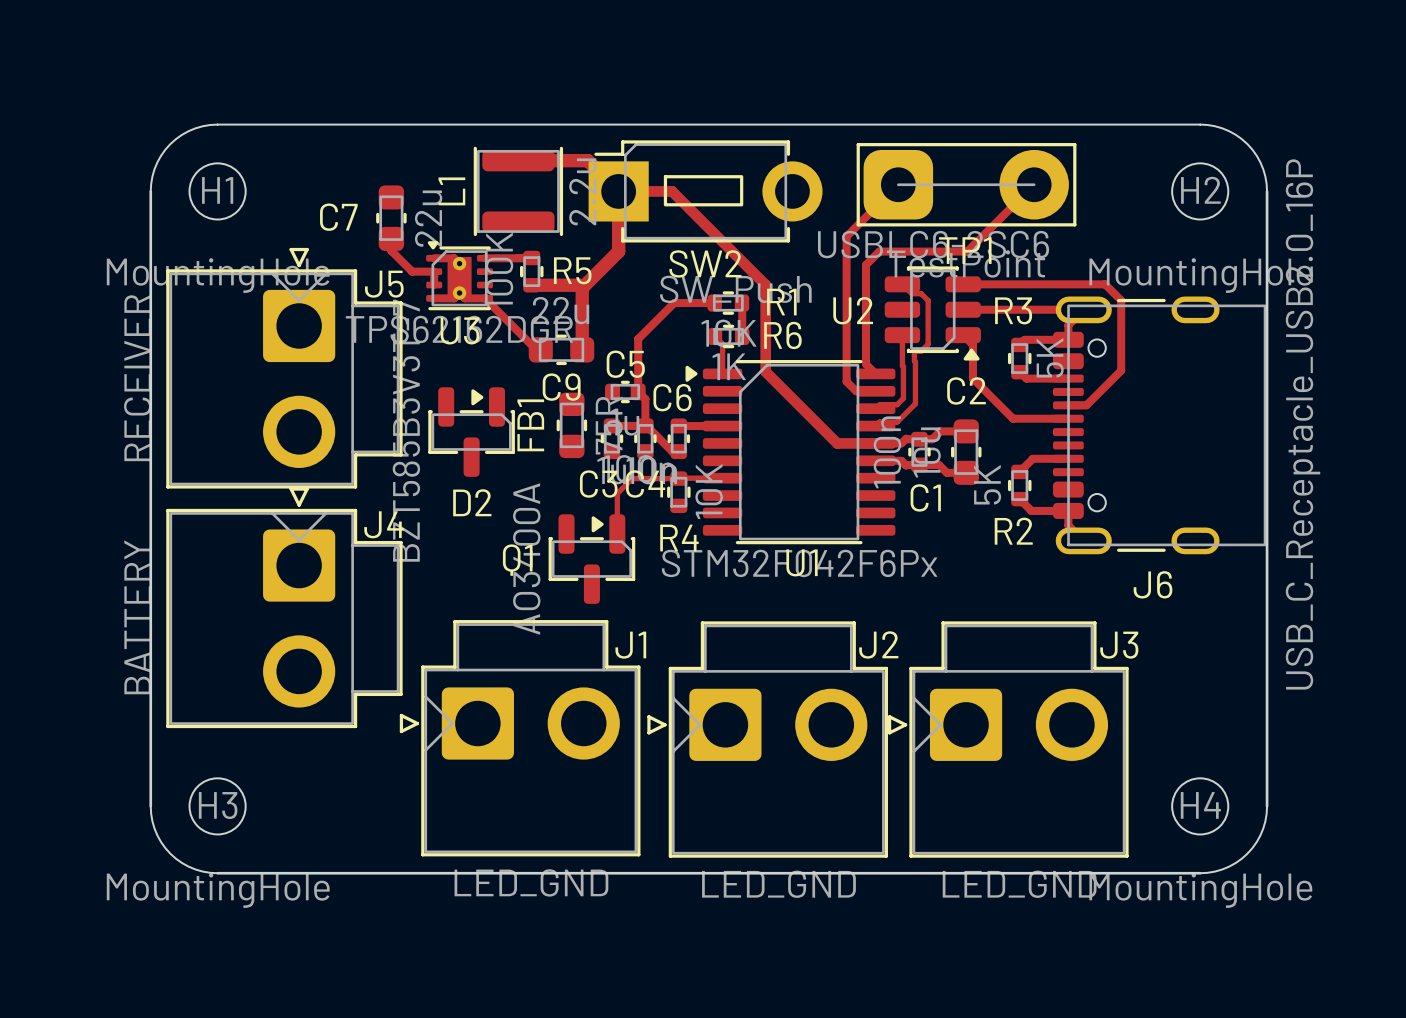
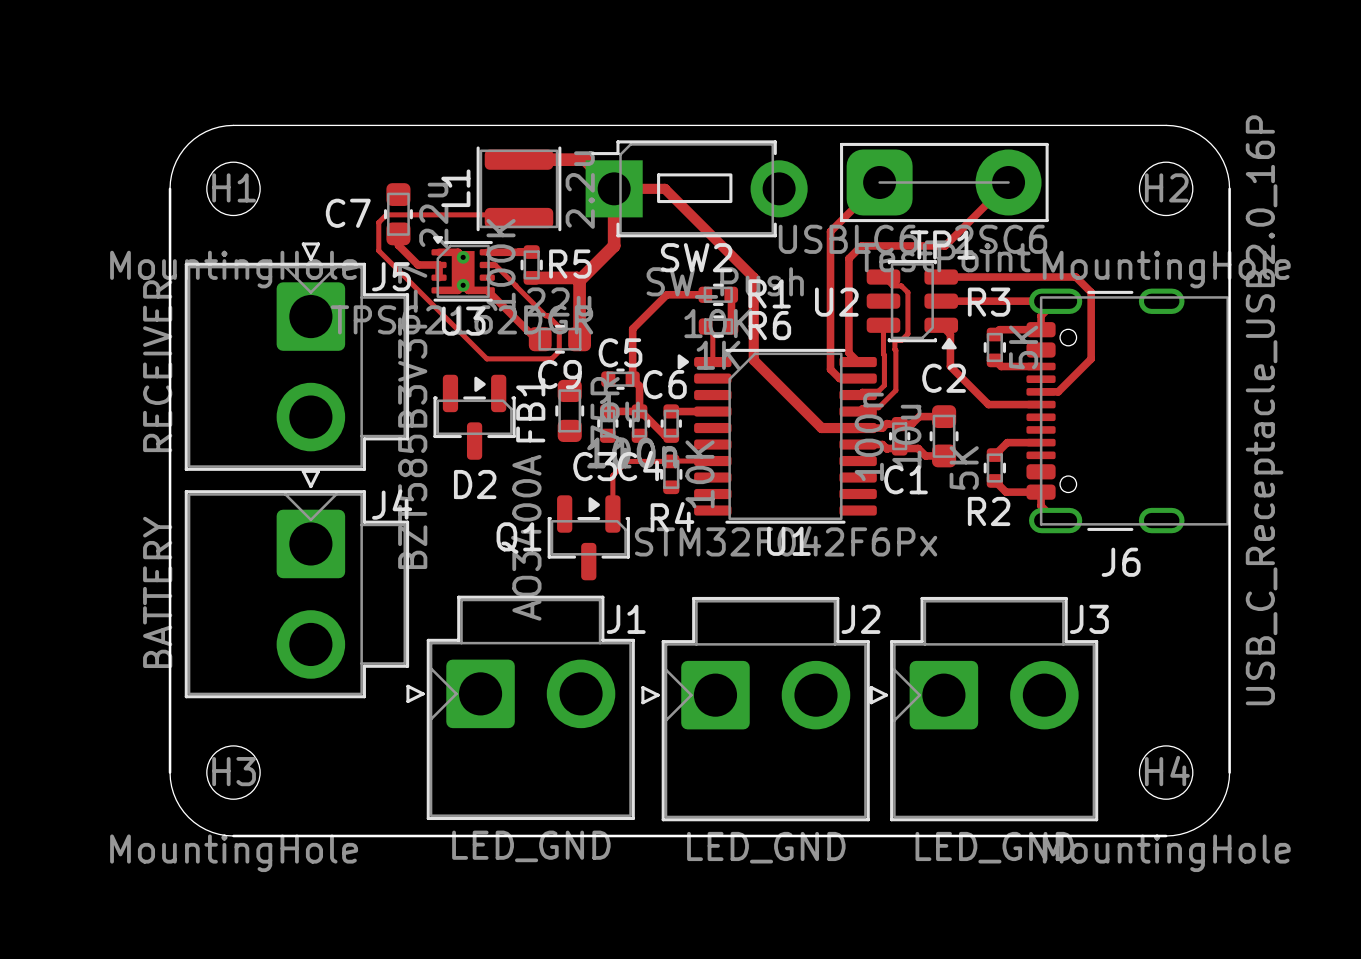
track: none -> (515, 214) (386, 214) (378, 222) (378, 250) (486, 358) (551, 358) (559, 351) (559, 327) (515, 286)
track: none -> (487, 264) (495, 264) (515, 285)

